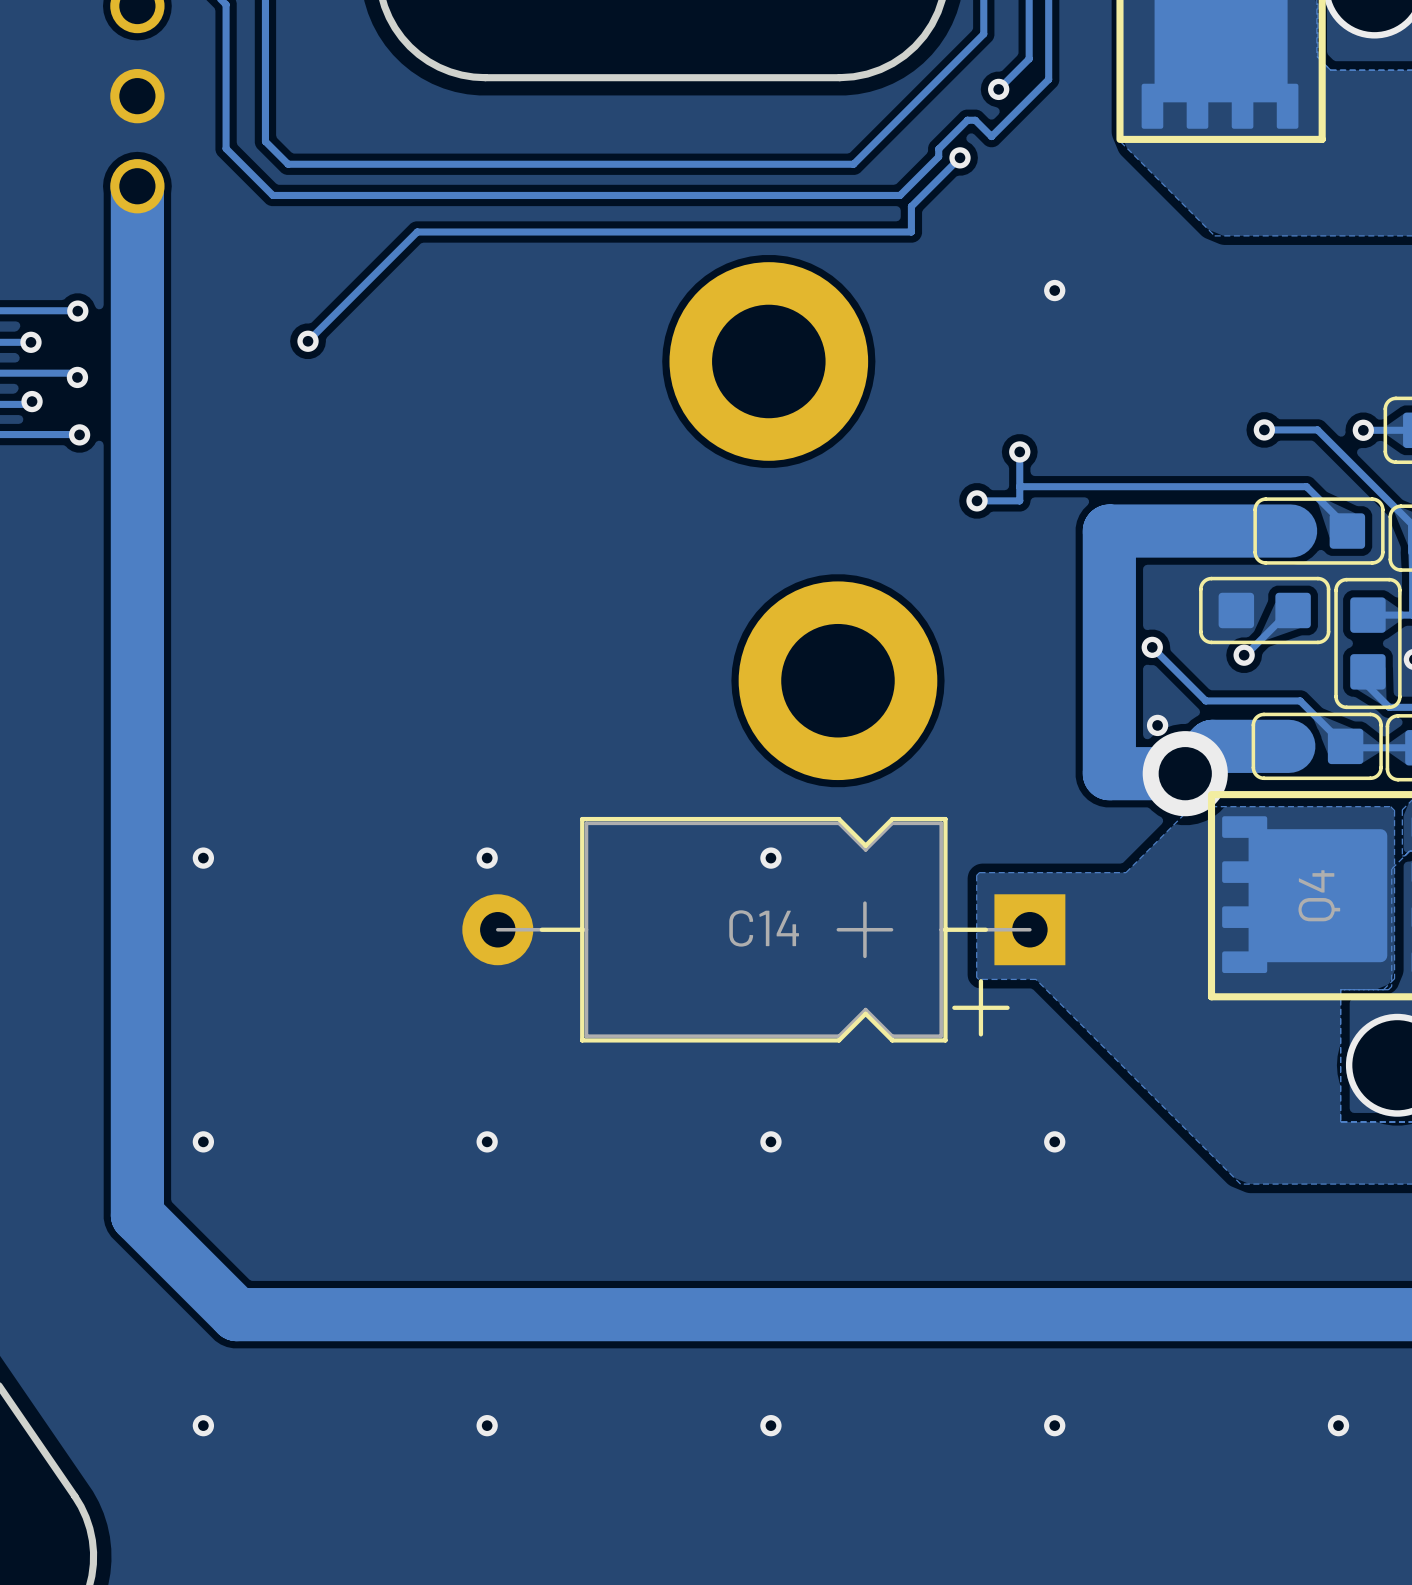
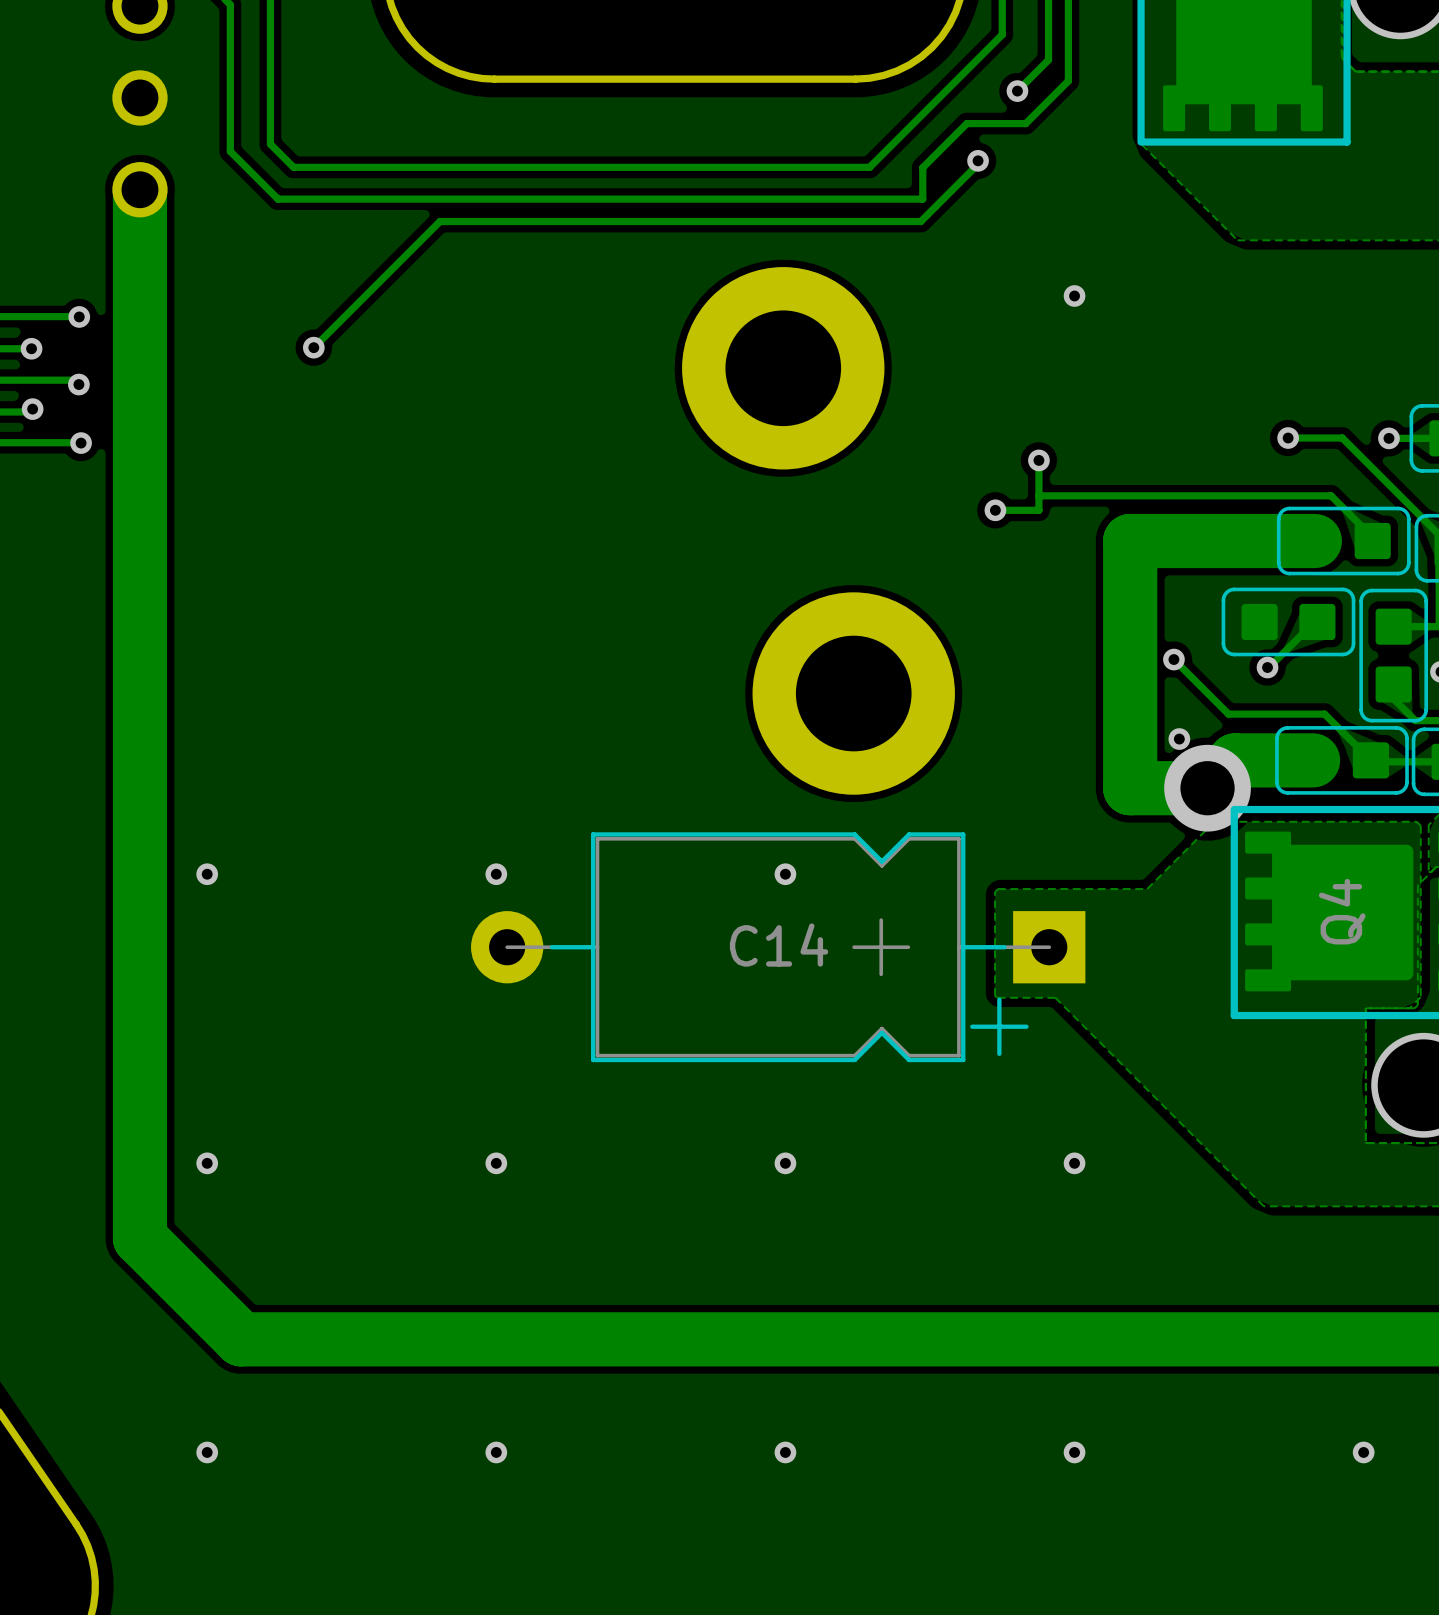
track: (1006, 121) (991, 136) (975, 120) (967, 120) (938, 149) (938, 156) (900, 195) -> (1025, 123) (966, 123) (922, 167) (922, 199) (916, 199)
track: (960, 157) (911, 206) (911, 232) (417, 232) -> (978, 160) (978, 164) (920, 221) (439, 221) (425, 236)

